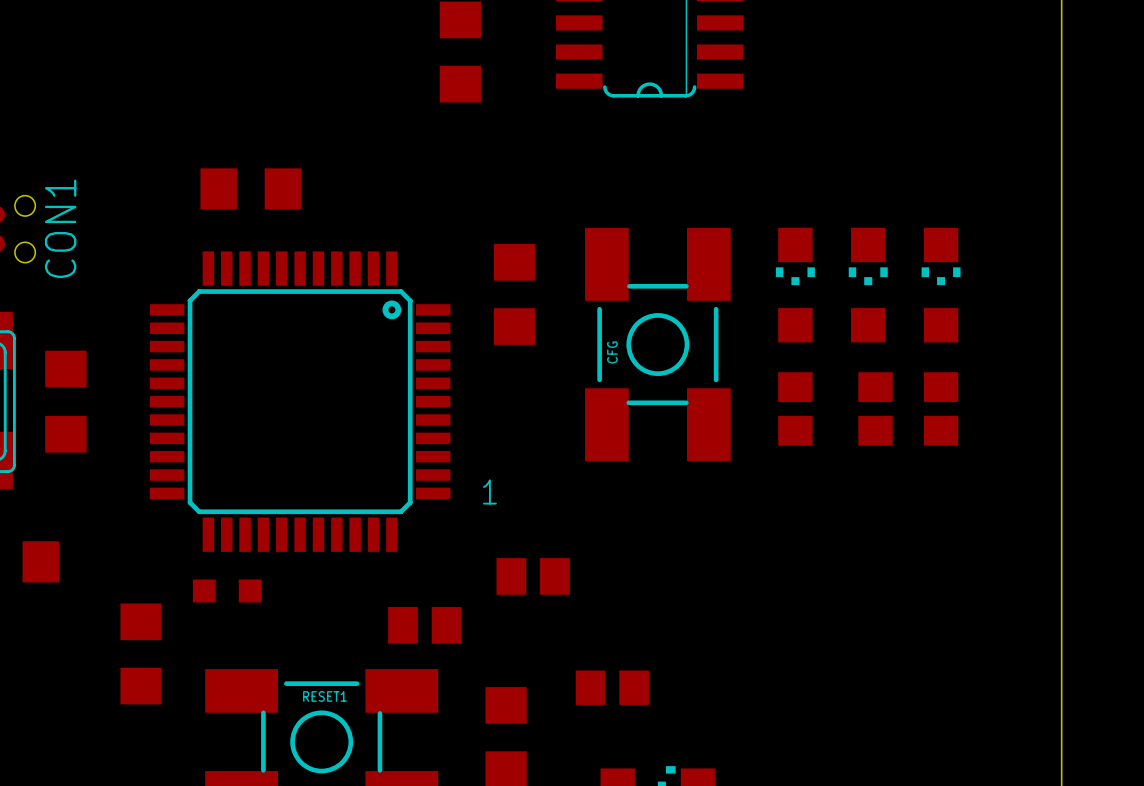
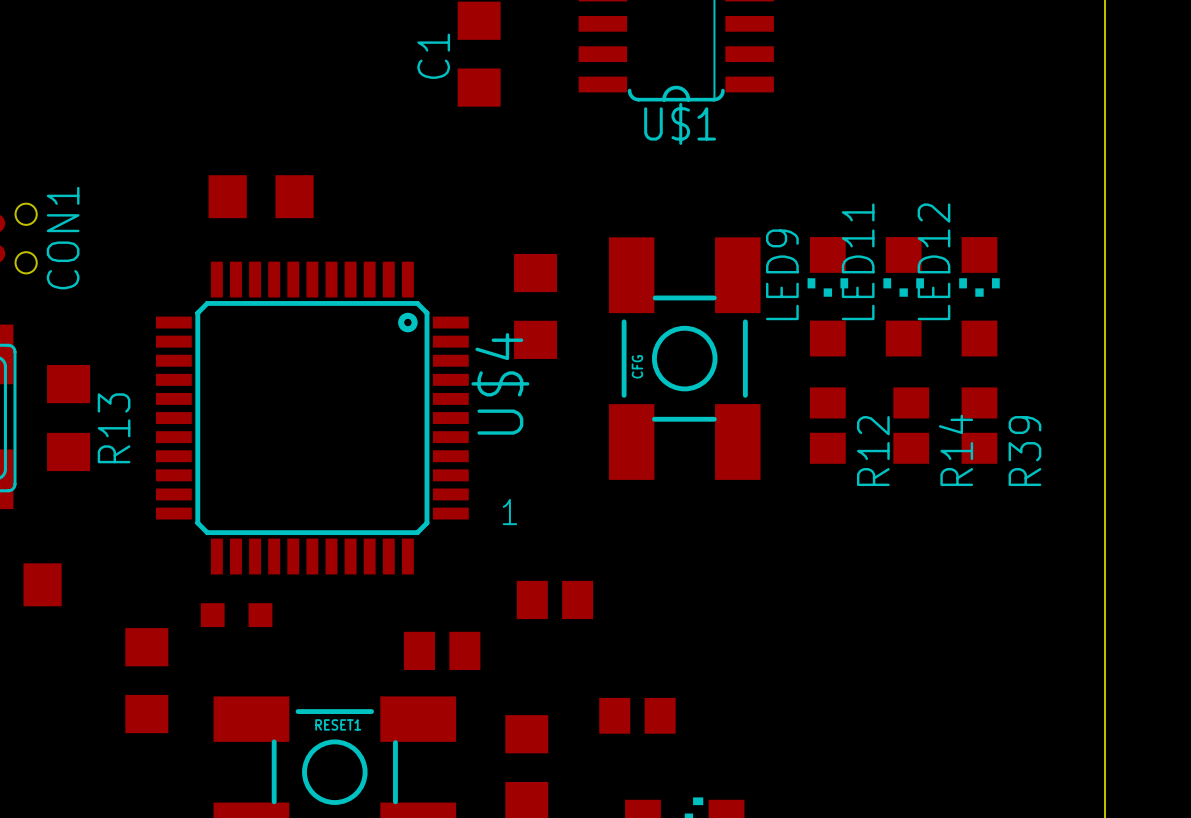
C1 name: none -> C1 (433, 56)
U$1 name: none -> U$1 (680, 123)
LED11 name: none -> LED11 (858, 261)
LED12 name: none -> LED12 (933, 261)
LED9 name: none -> LED9 (782, 274)
U$4 name: none -> U$4 (500, 383)
R13 name: none -> R13 (114, 428)
R14 name: none -> R14 (956, 450)
R12 name: none -> R12 (873, 451)
R39 name: none -> R39 (1024, 451)

